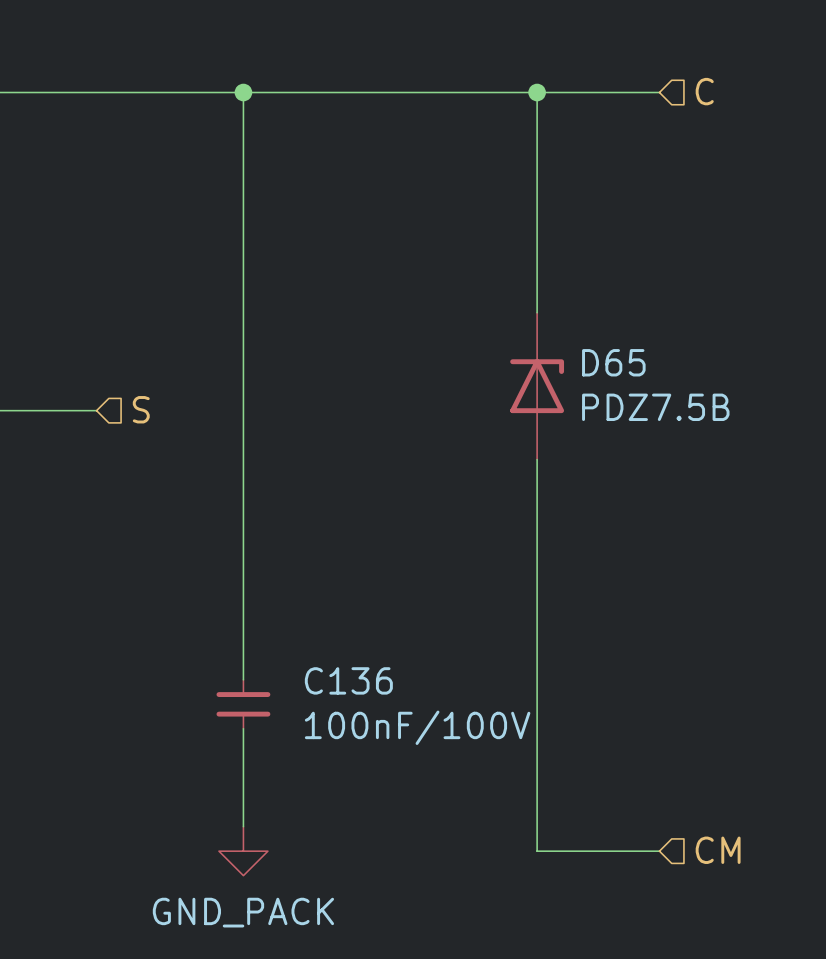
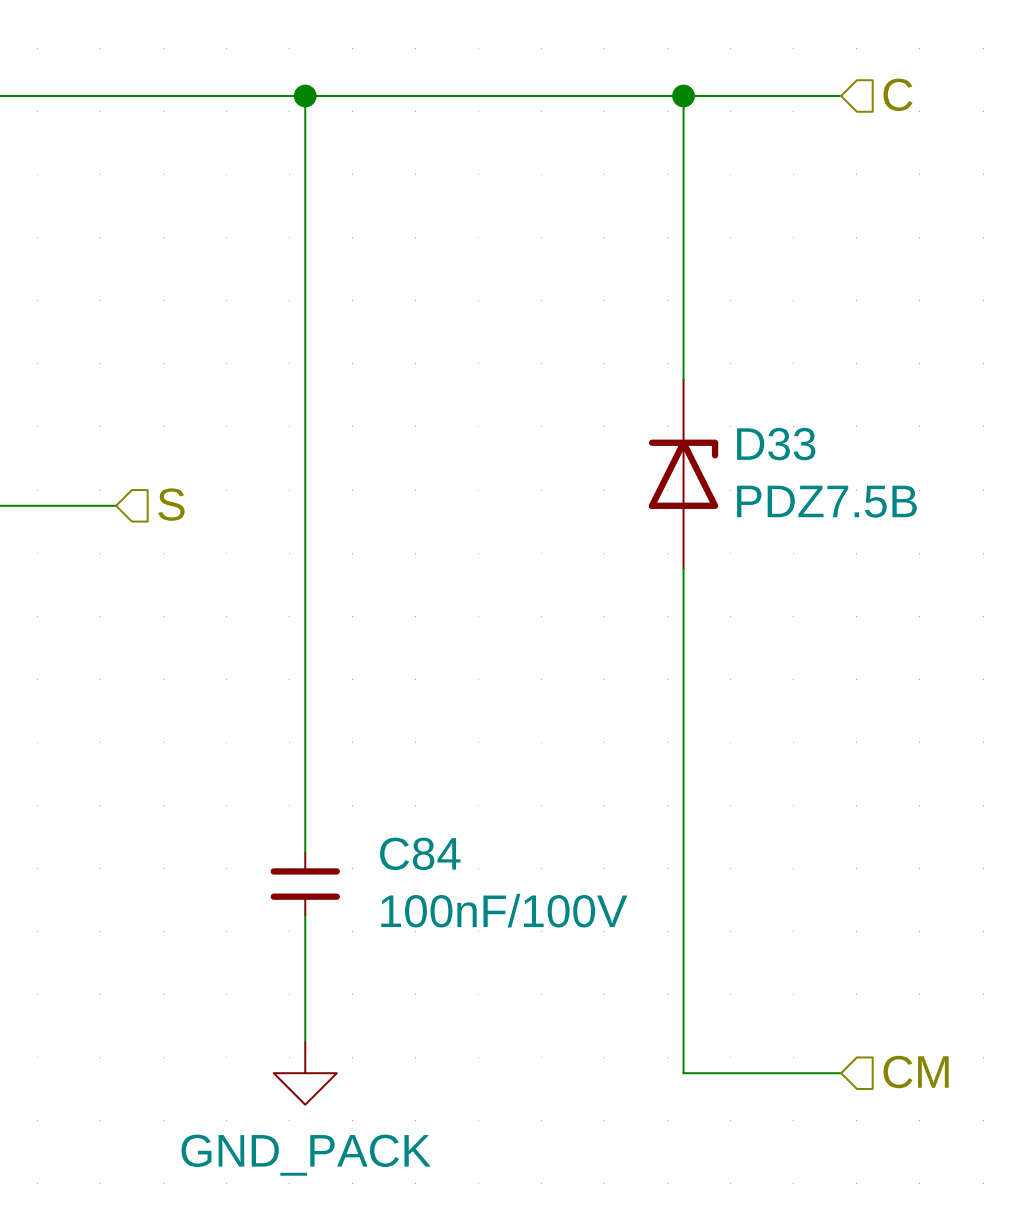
D65 name: D65 (613, 362) -> D33 (776, 444)
C136 name: C136 (348, 680) -> C84 (420, 853)

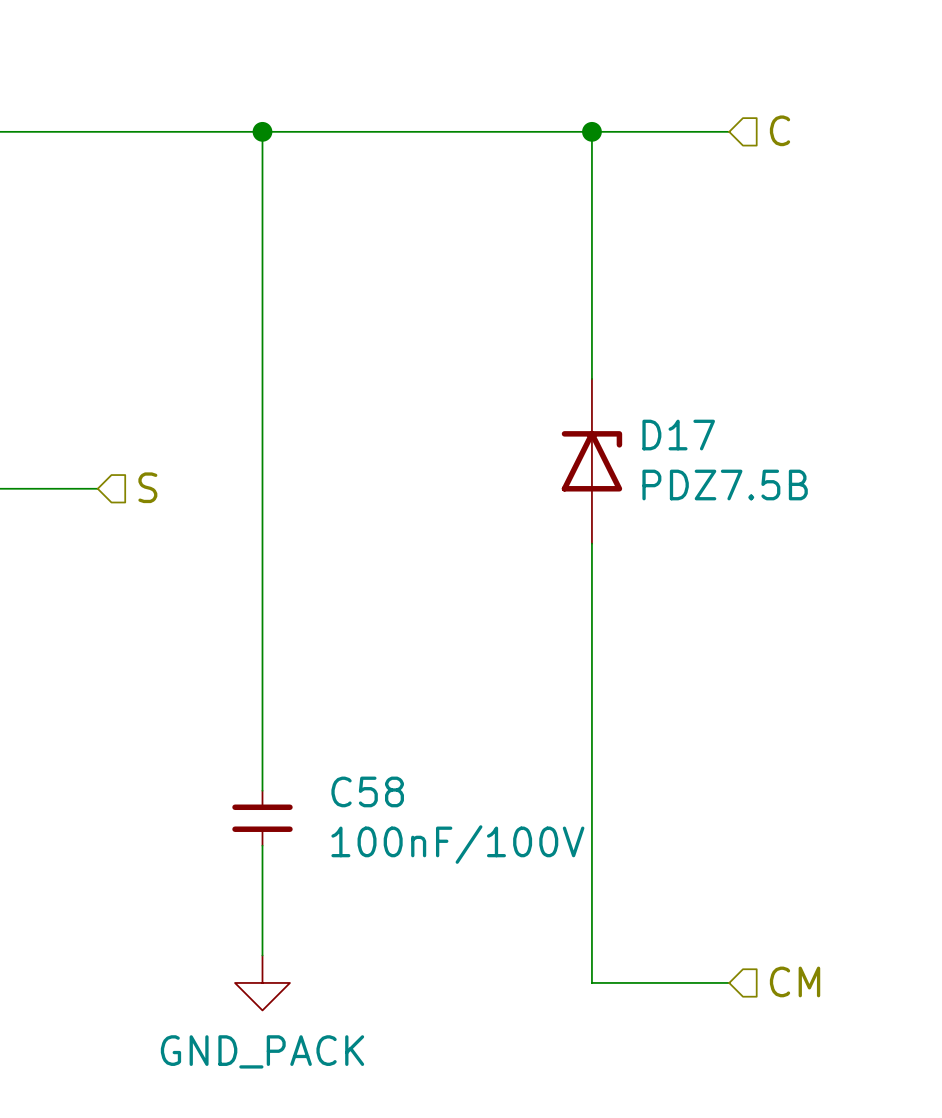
D33 name: D33 (776, 444) -> D17 (678, 435)
C84 name: C84 (420, 853) -> C58 (367, 791)

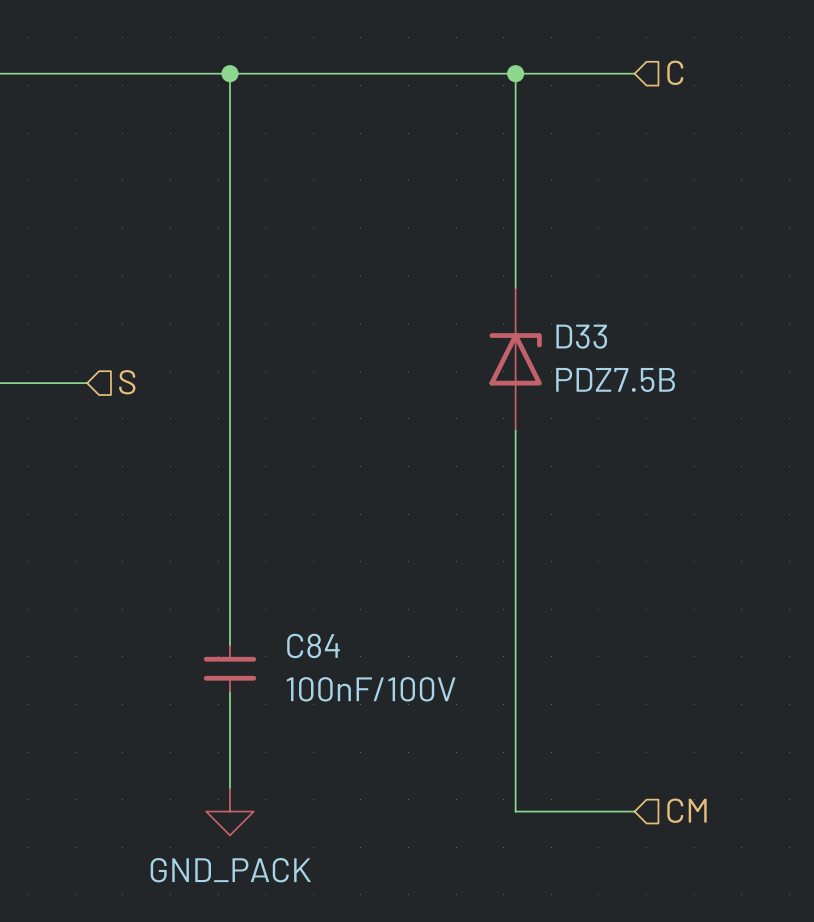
D17 name: D17 (678, 435) -> D33 (581, 336)
C58 name: C58 (367, 791) -> C84 (313, 645)

